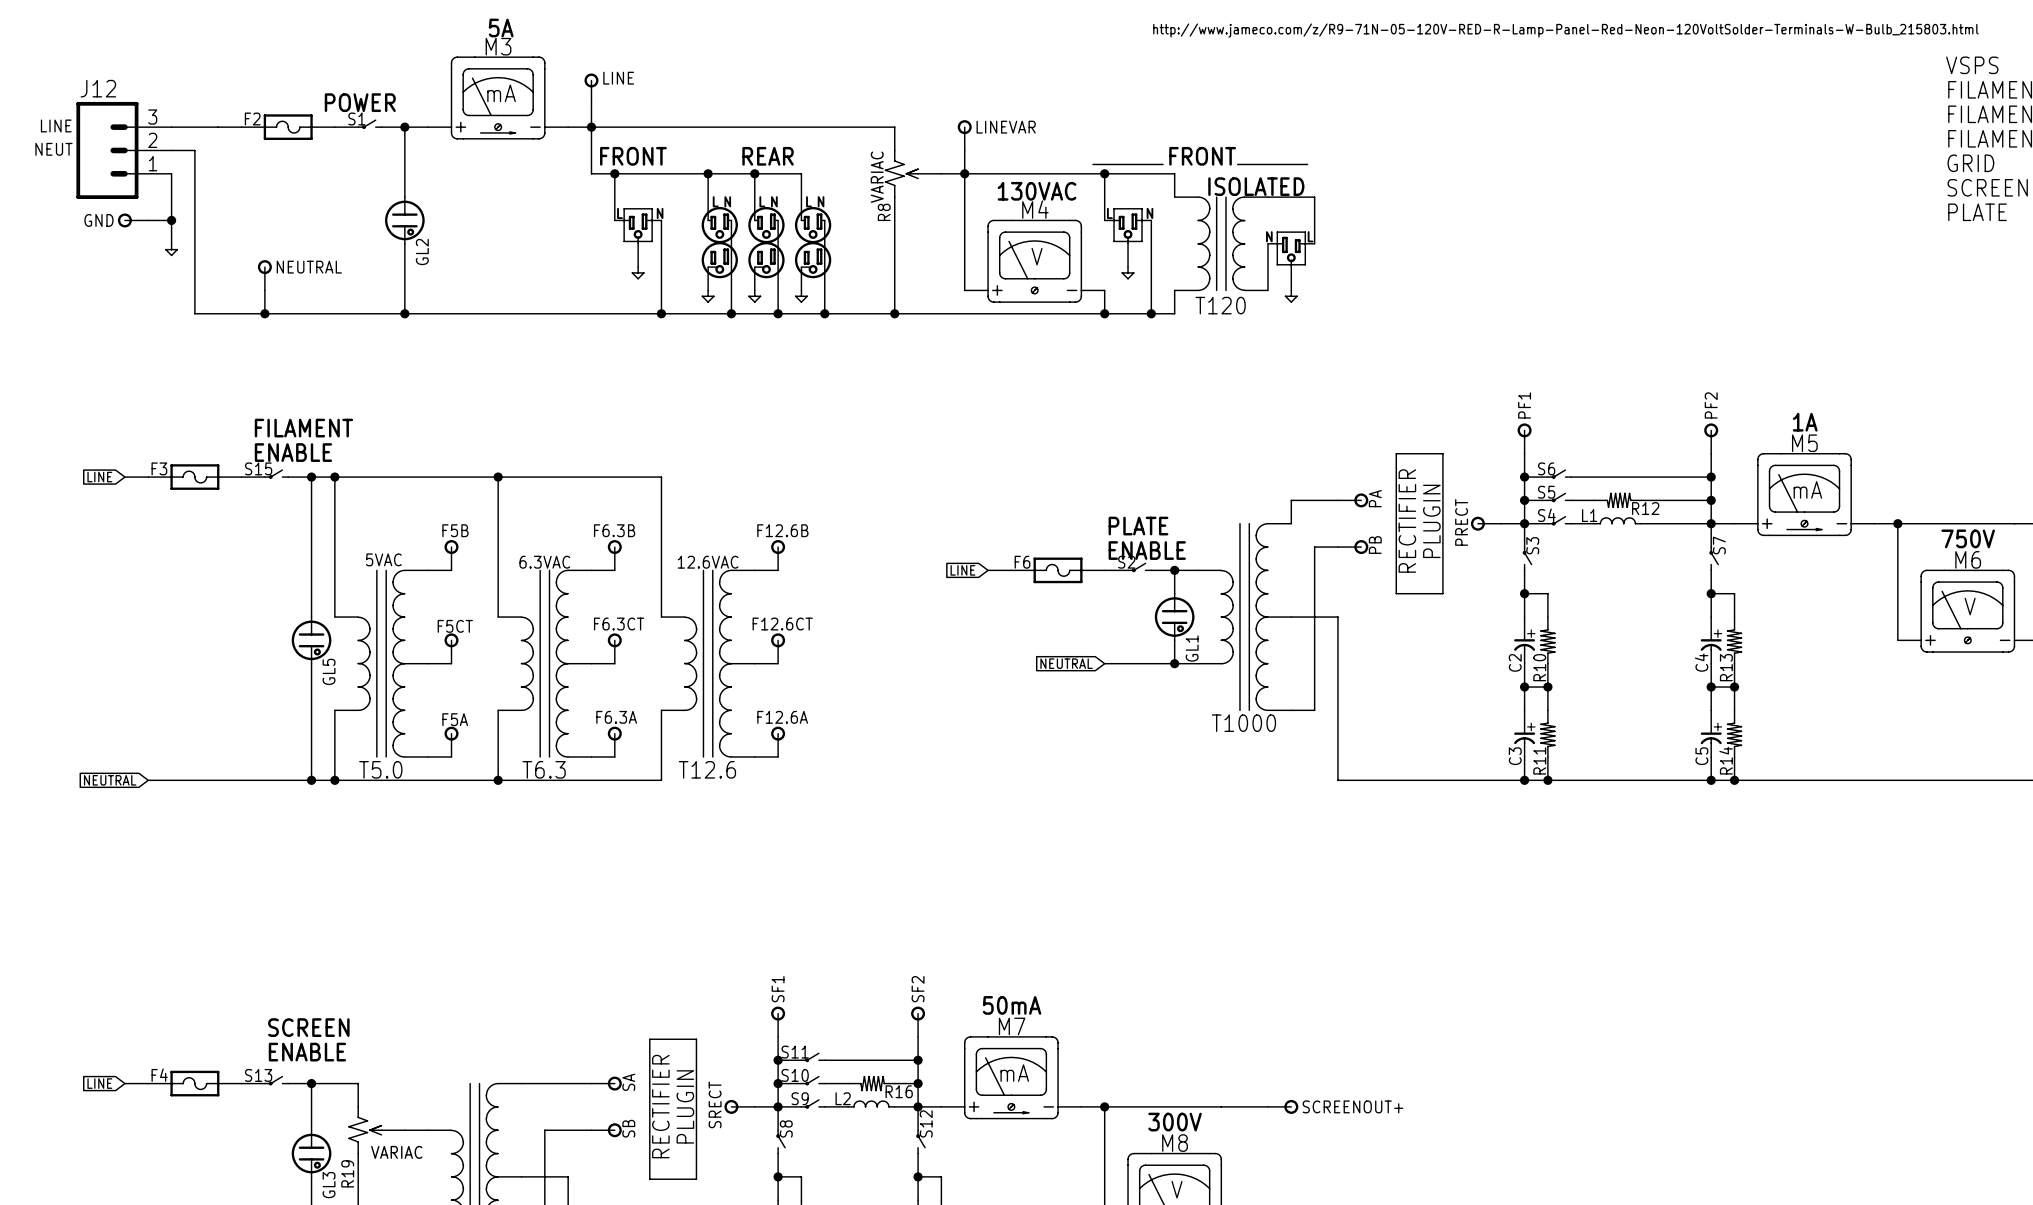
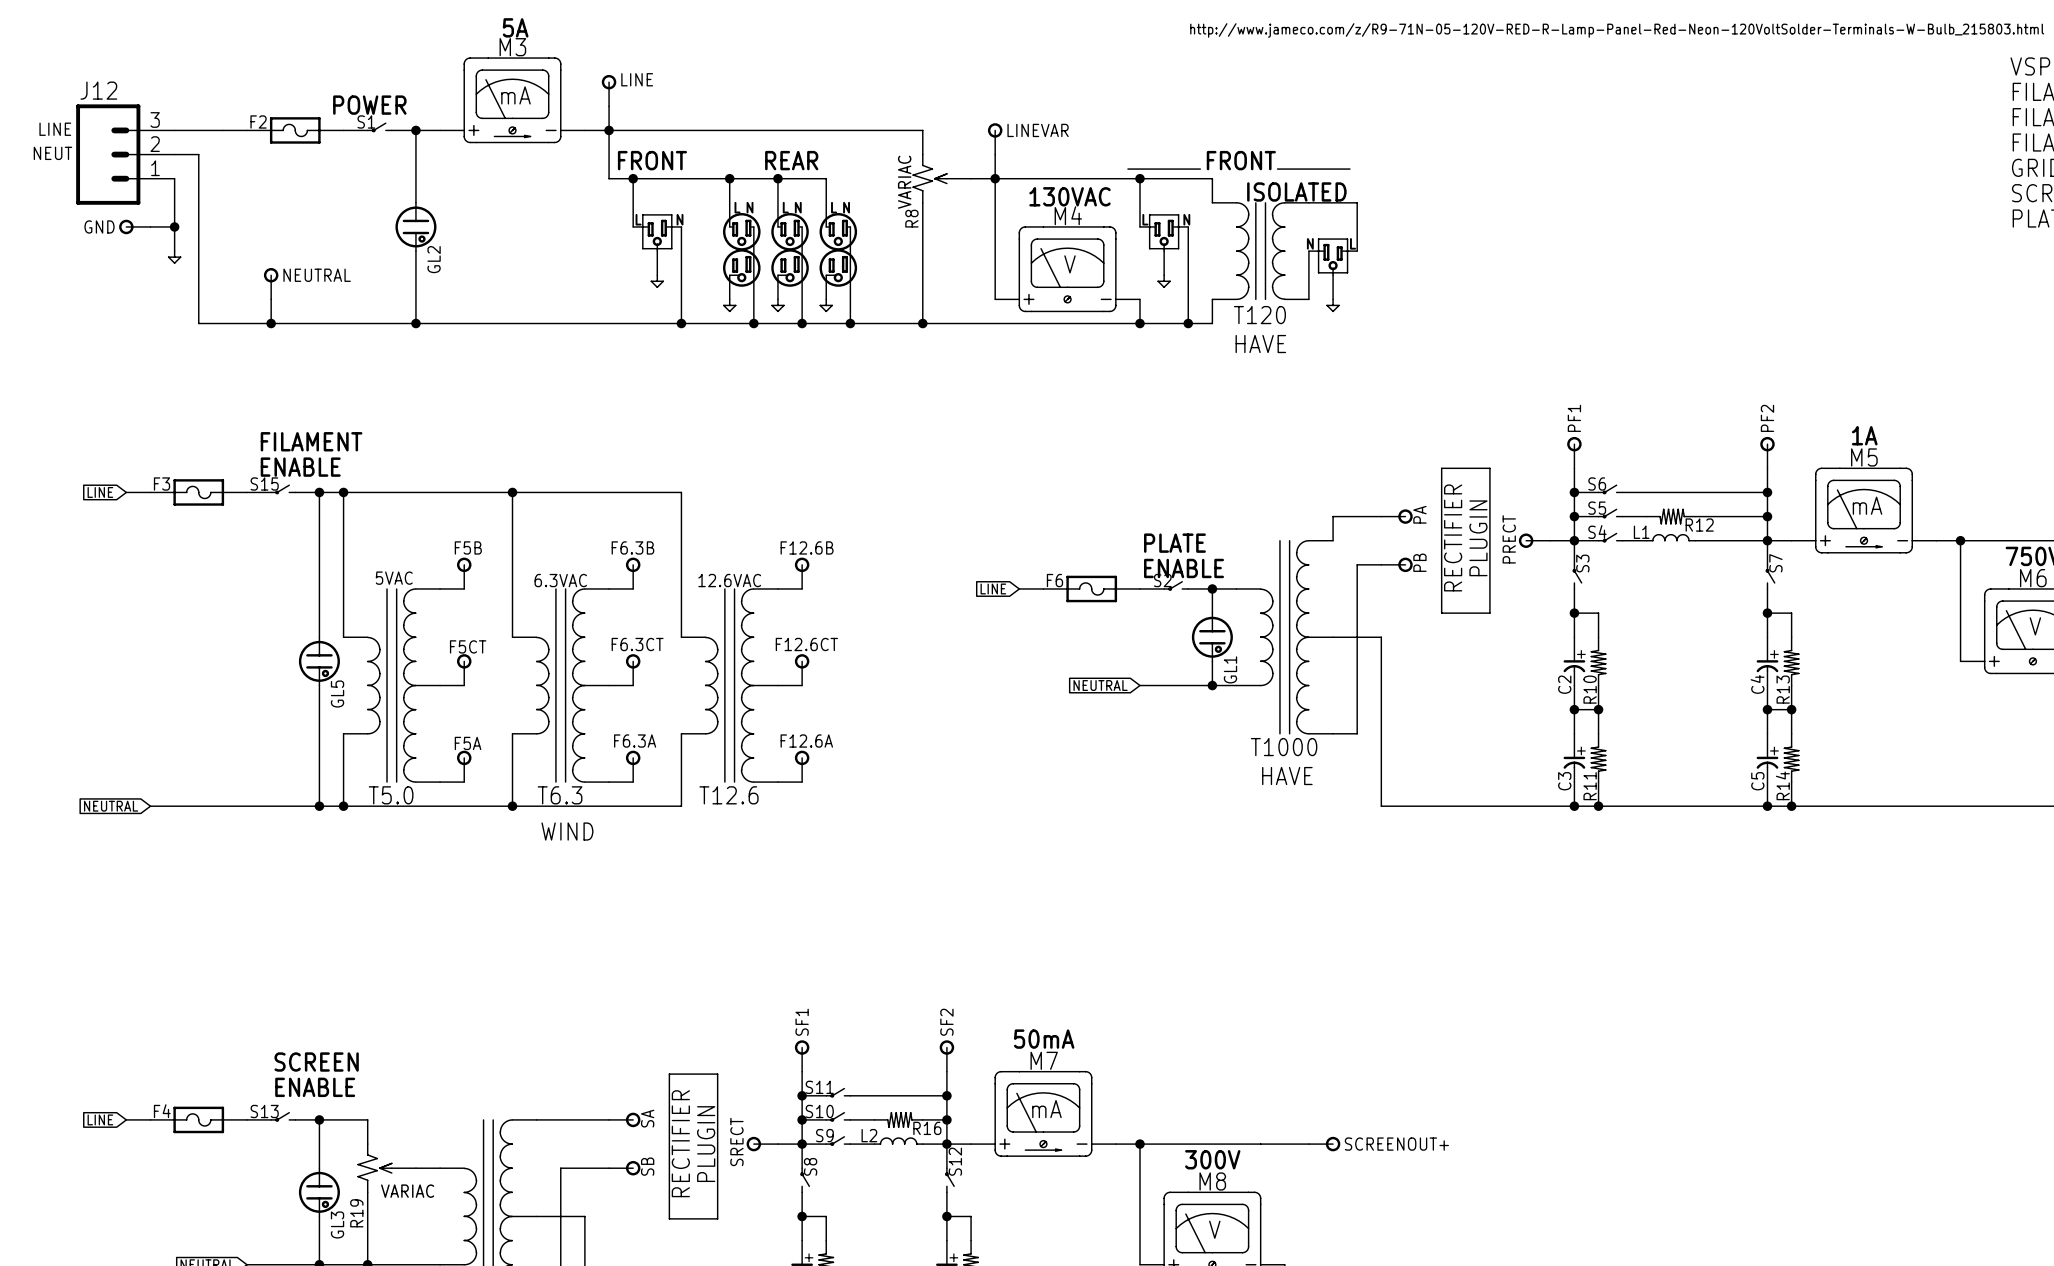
text: none -> HAVE (1260, 344)
text: none -> HAVE (1287, 776)
text: none -> WIND (567, 831)

